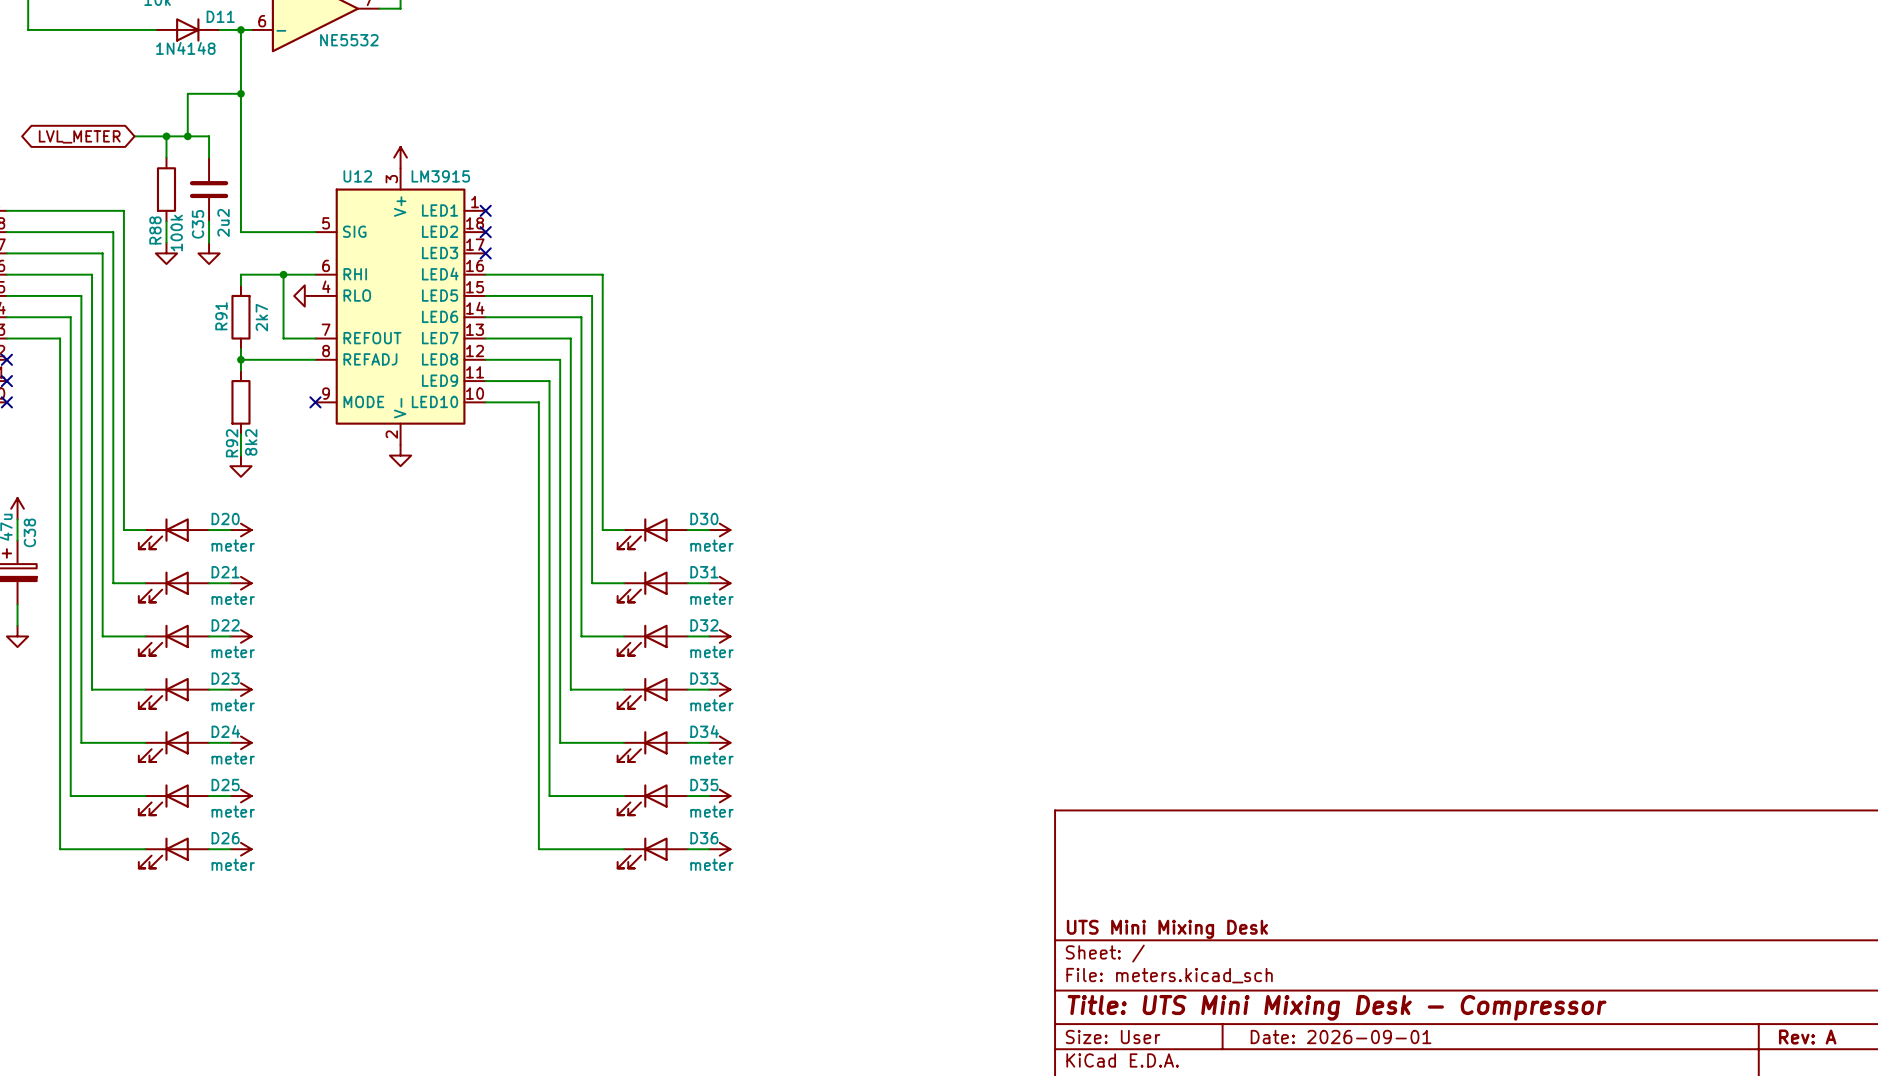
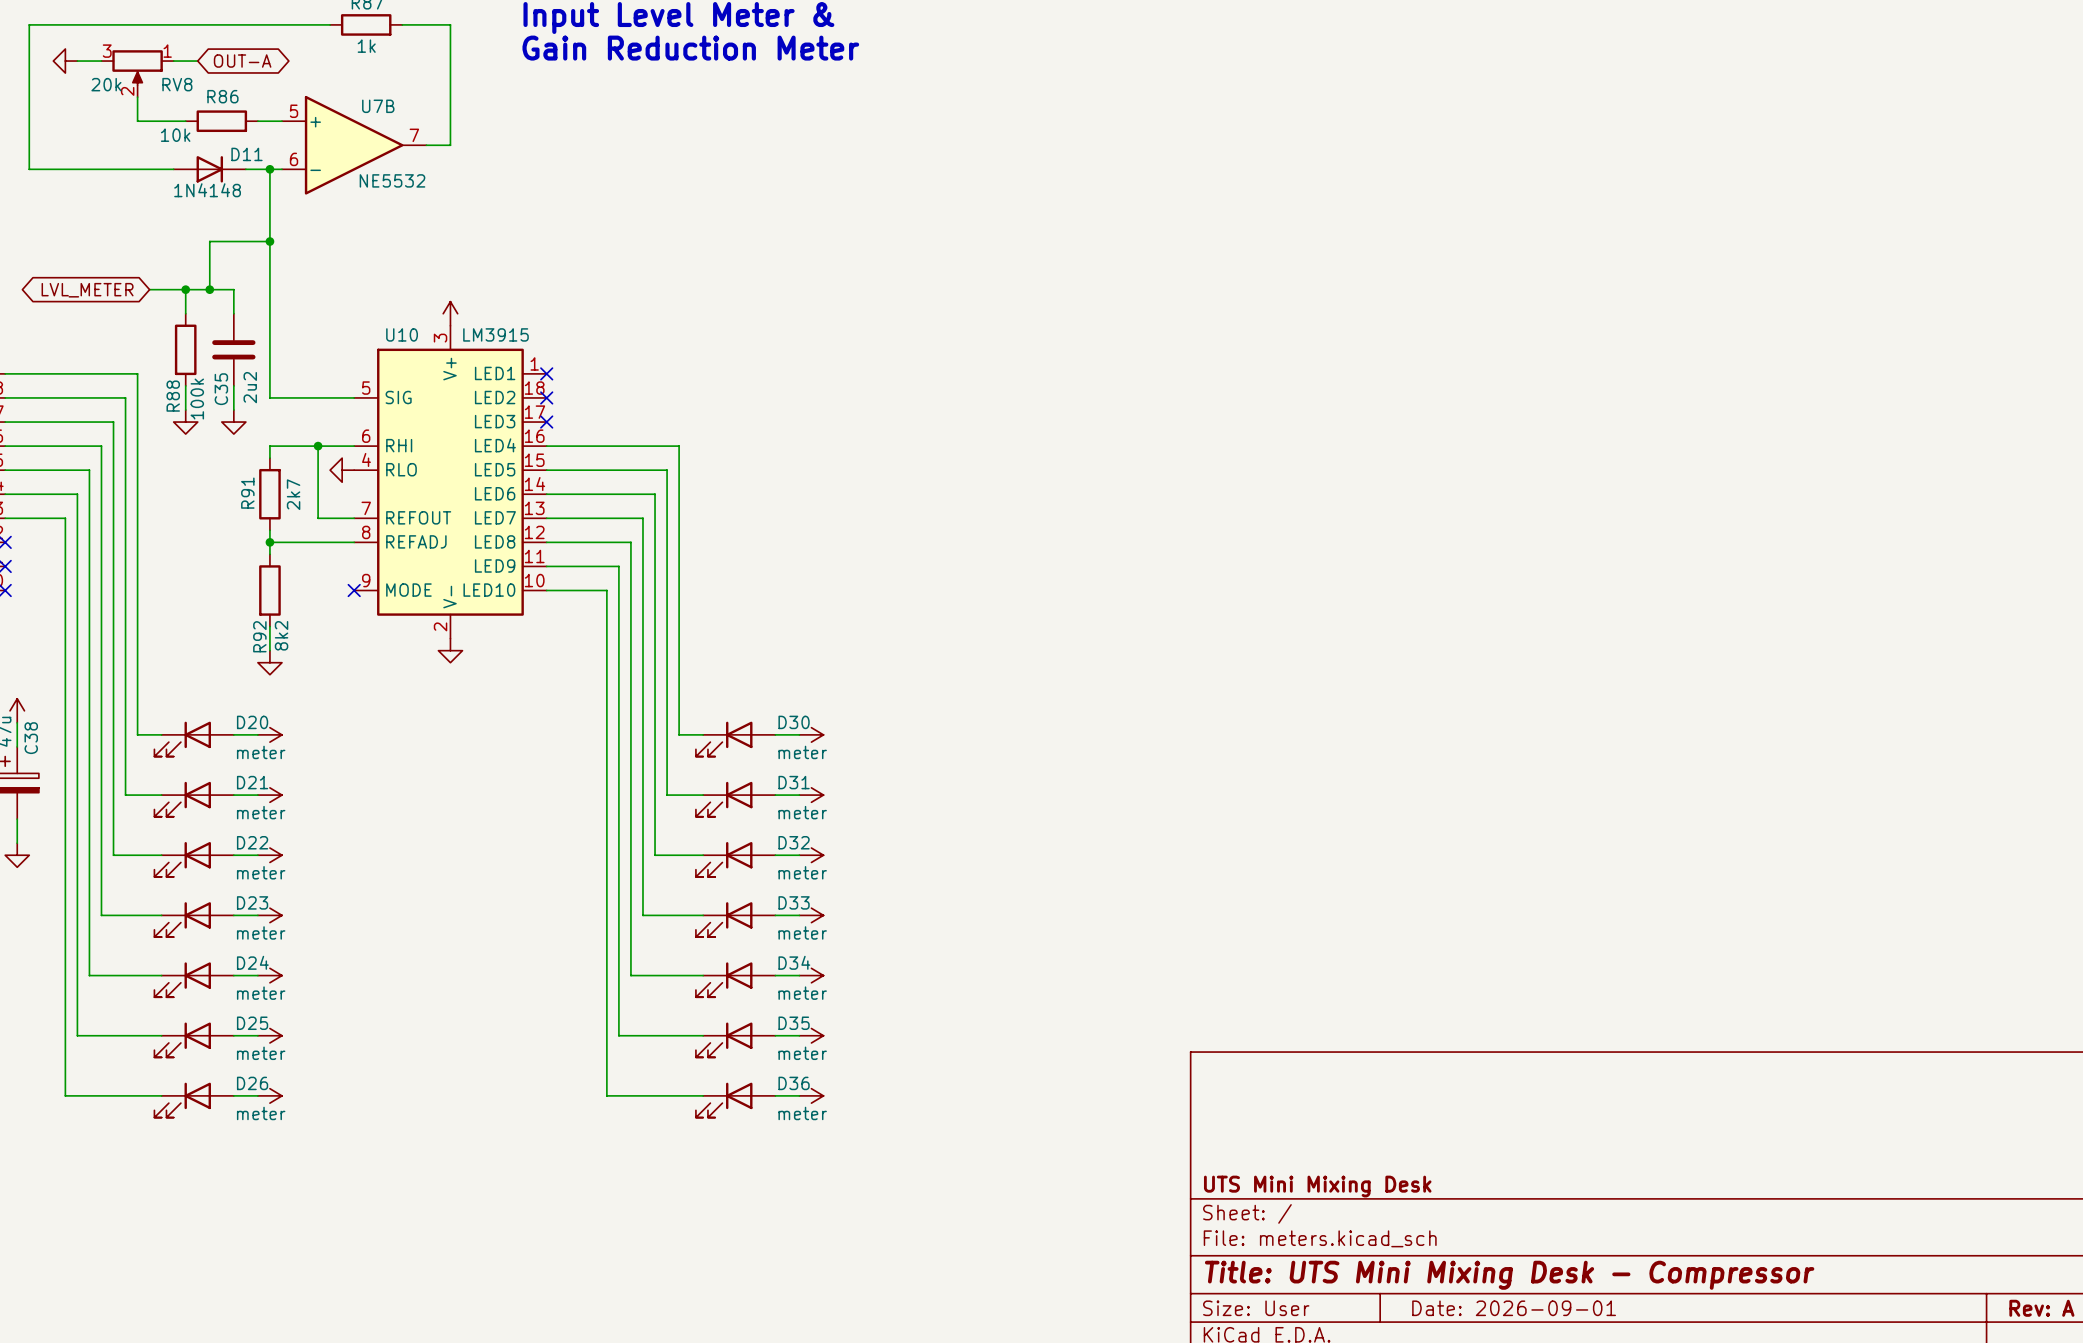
U12 name: U12 (357, 176) -> U10 (402, 334)

